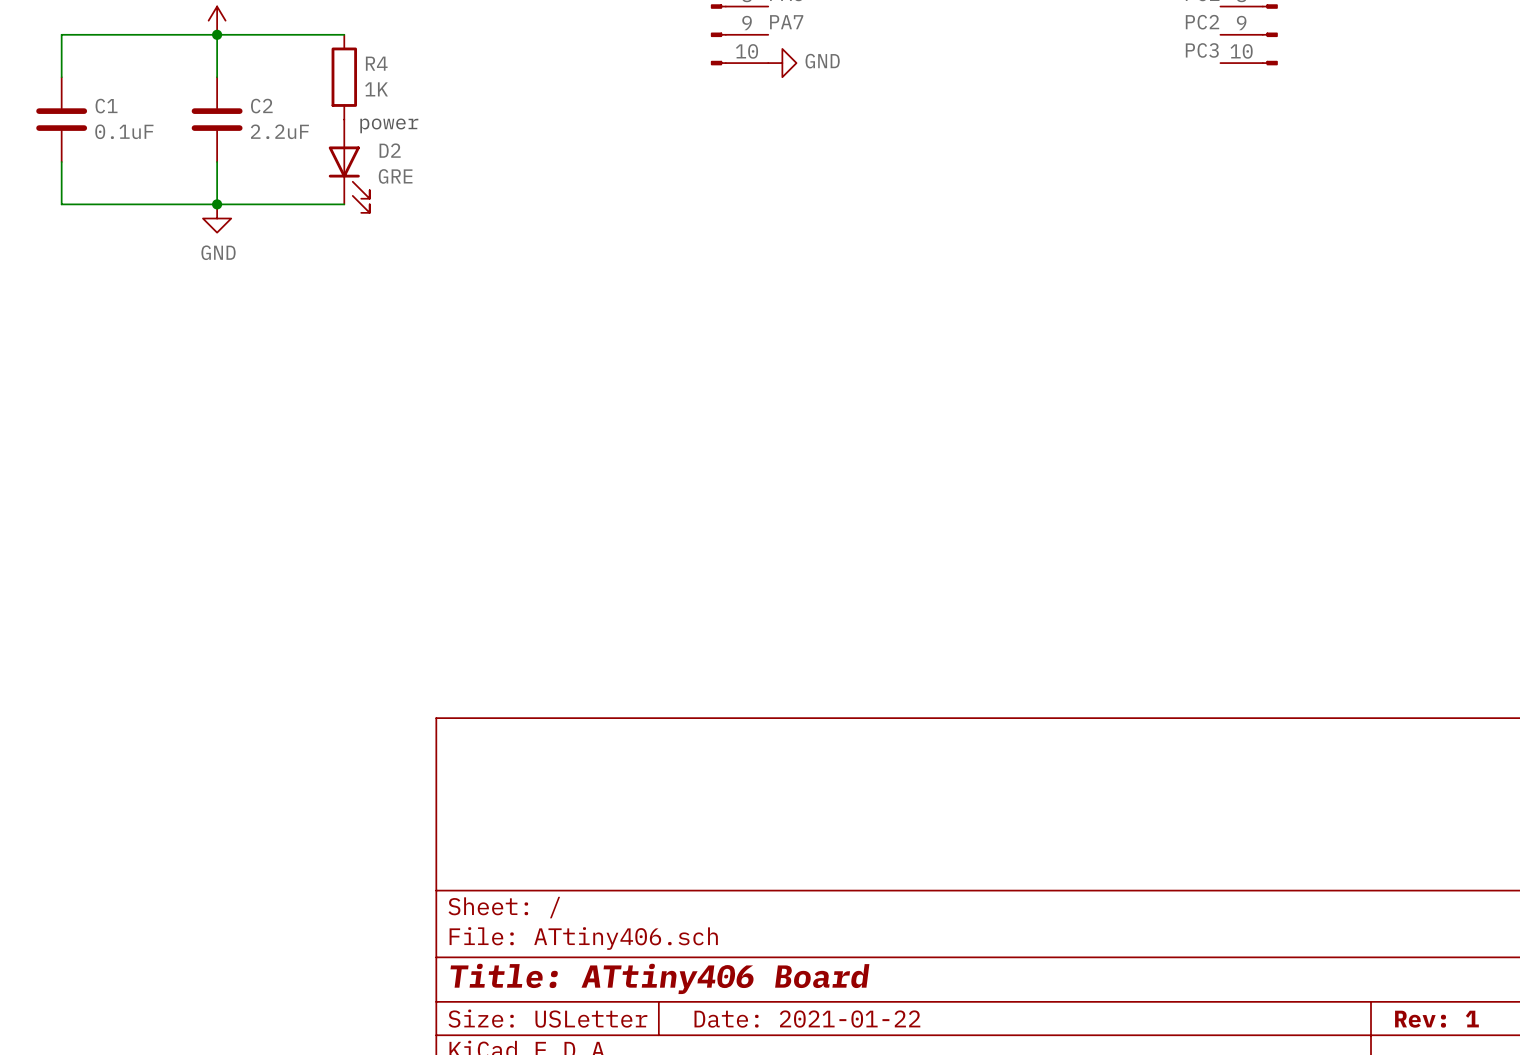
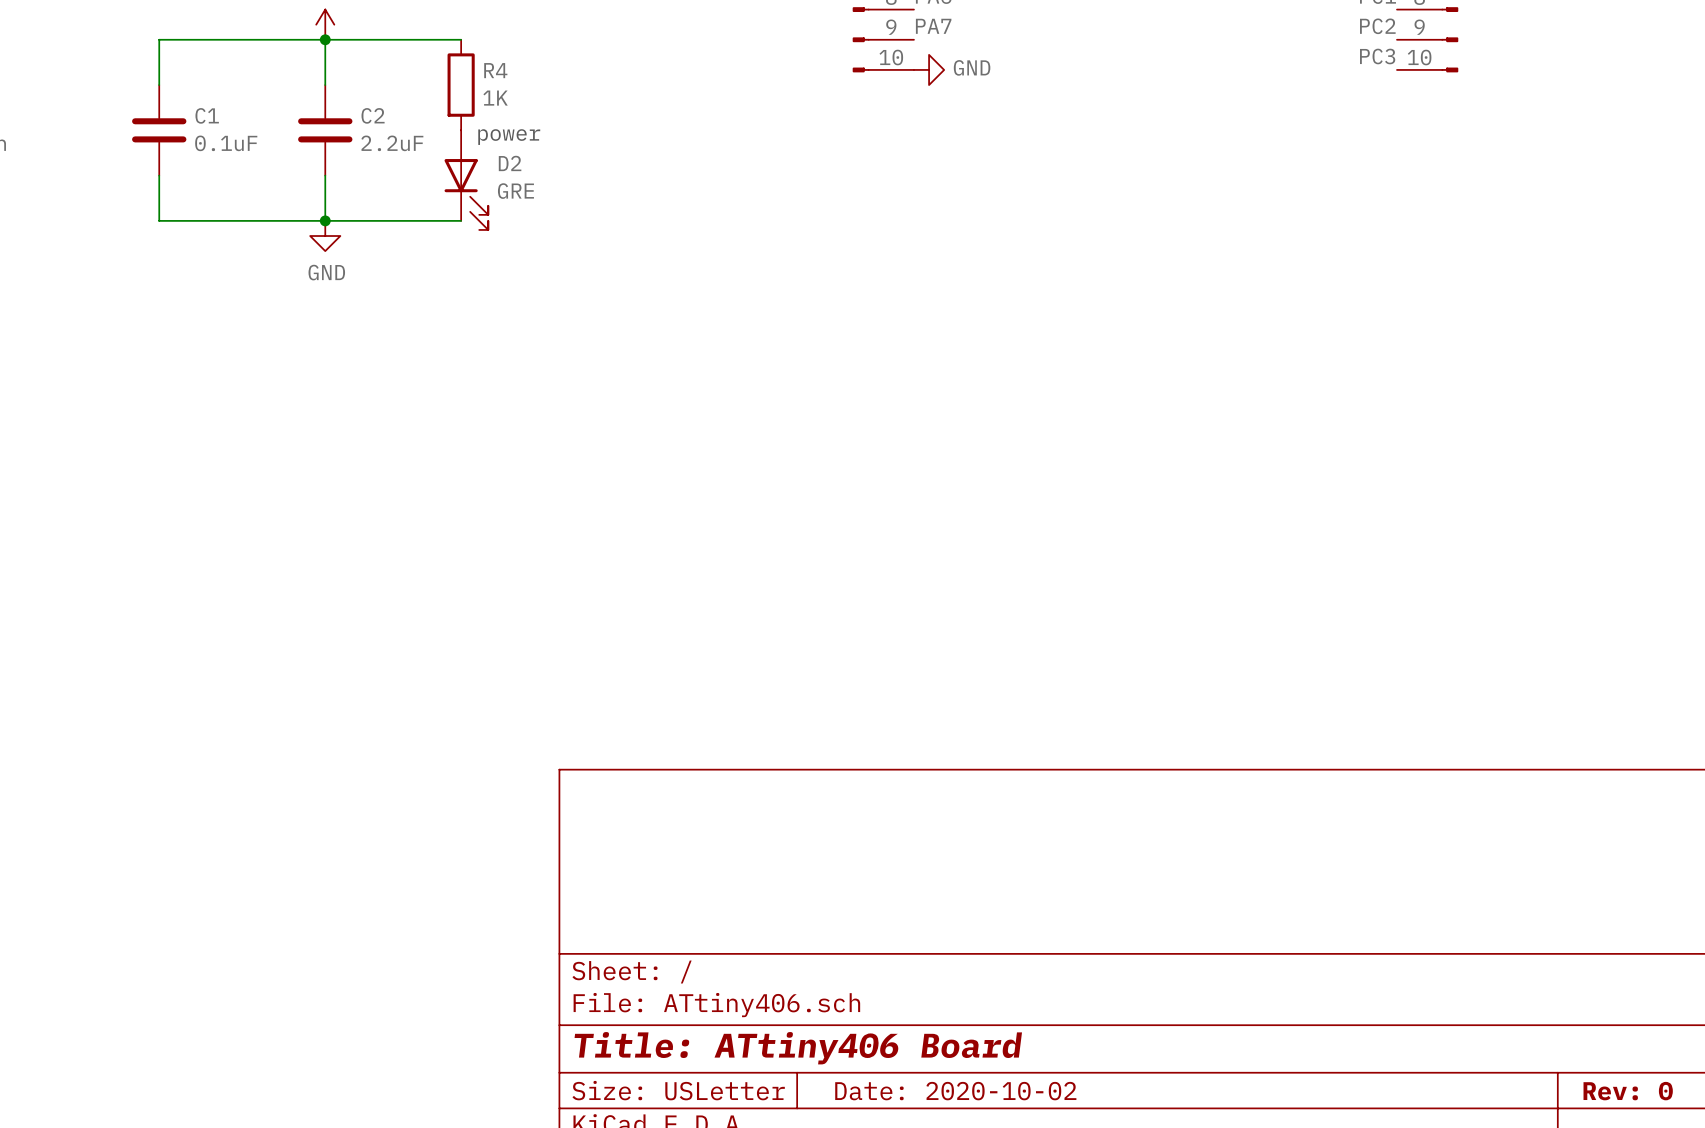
title block: Date: 2021-01-22 (807, 1019) -> Date: 2020-10-02 (955, 1091)
title block: Rev: 1 (1436, 1019) -> Rev: 0 (1628, 1091)

